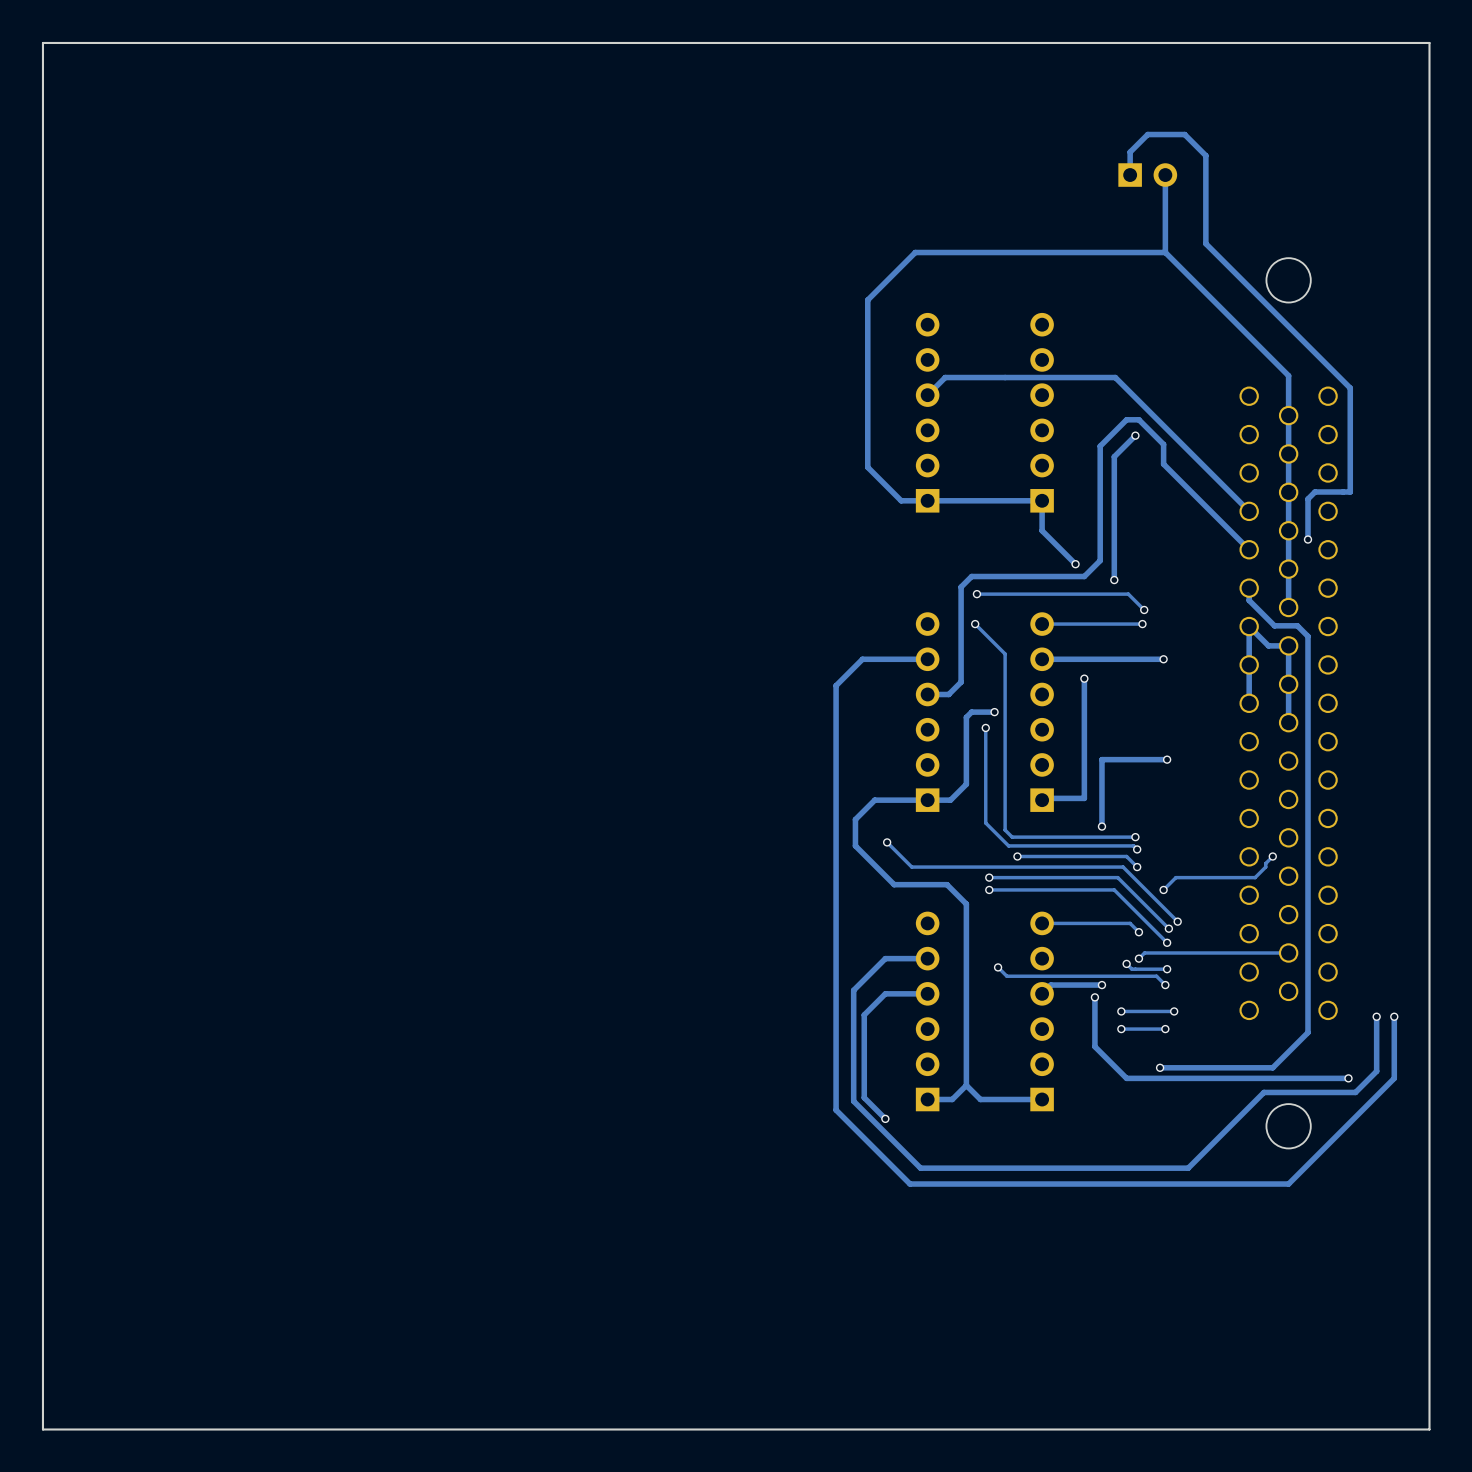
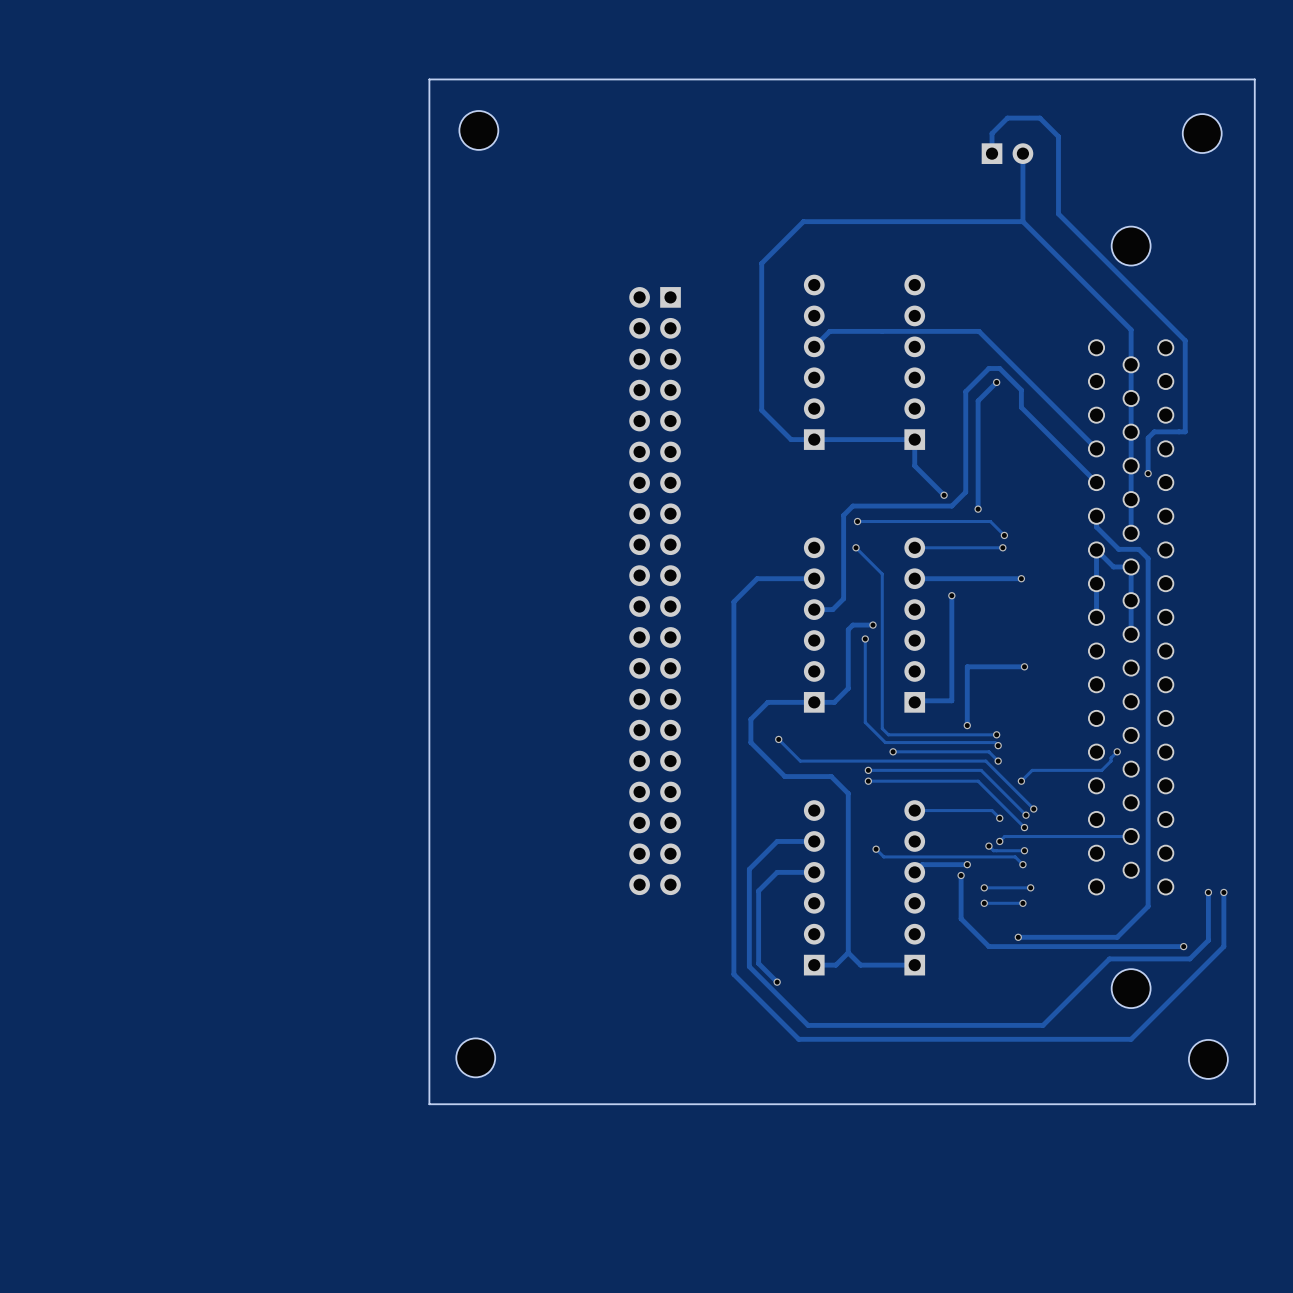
board edge: (1429, 90) (1429, 42) (42, 42) (42, 1429) (1429, 1429) (1429, 1257) -> (1254, 79) (429, 79) (429, 1104) (1254, 1104)
part: none -> (478, 130)
part: none -> (1202, 133)
part: none -> (655, 591)
part: none -> (475, 1057)
part: none -> (1208, 1059)

